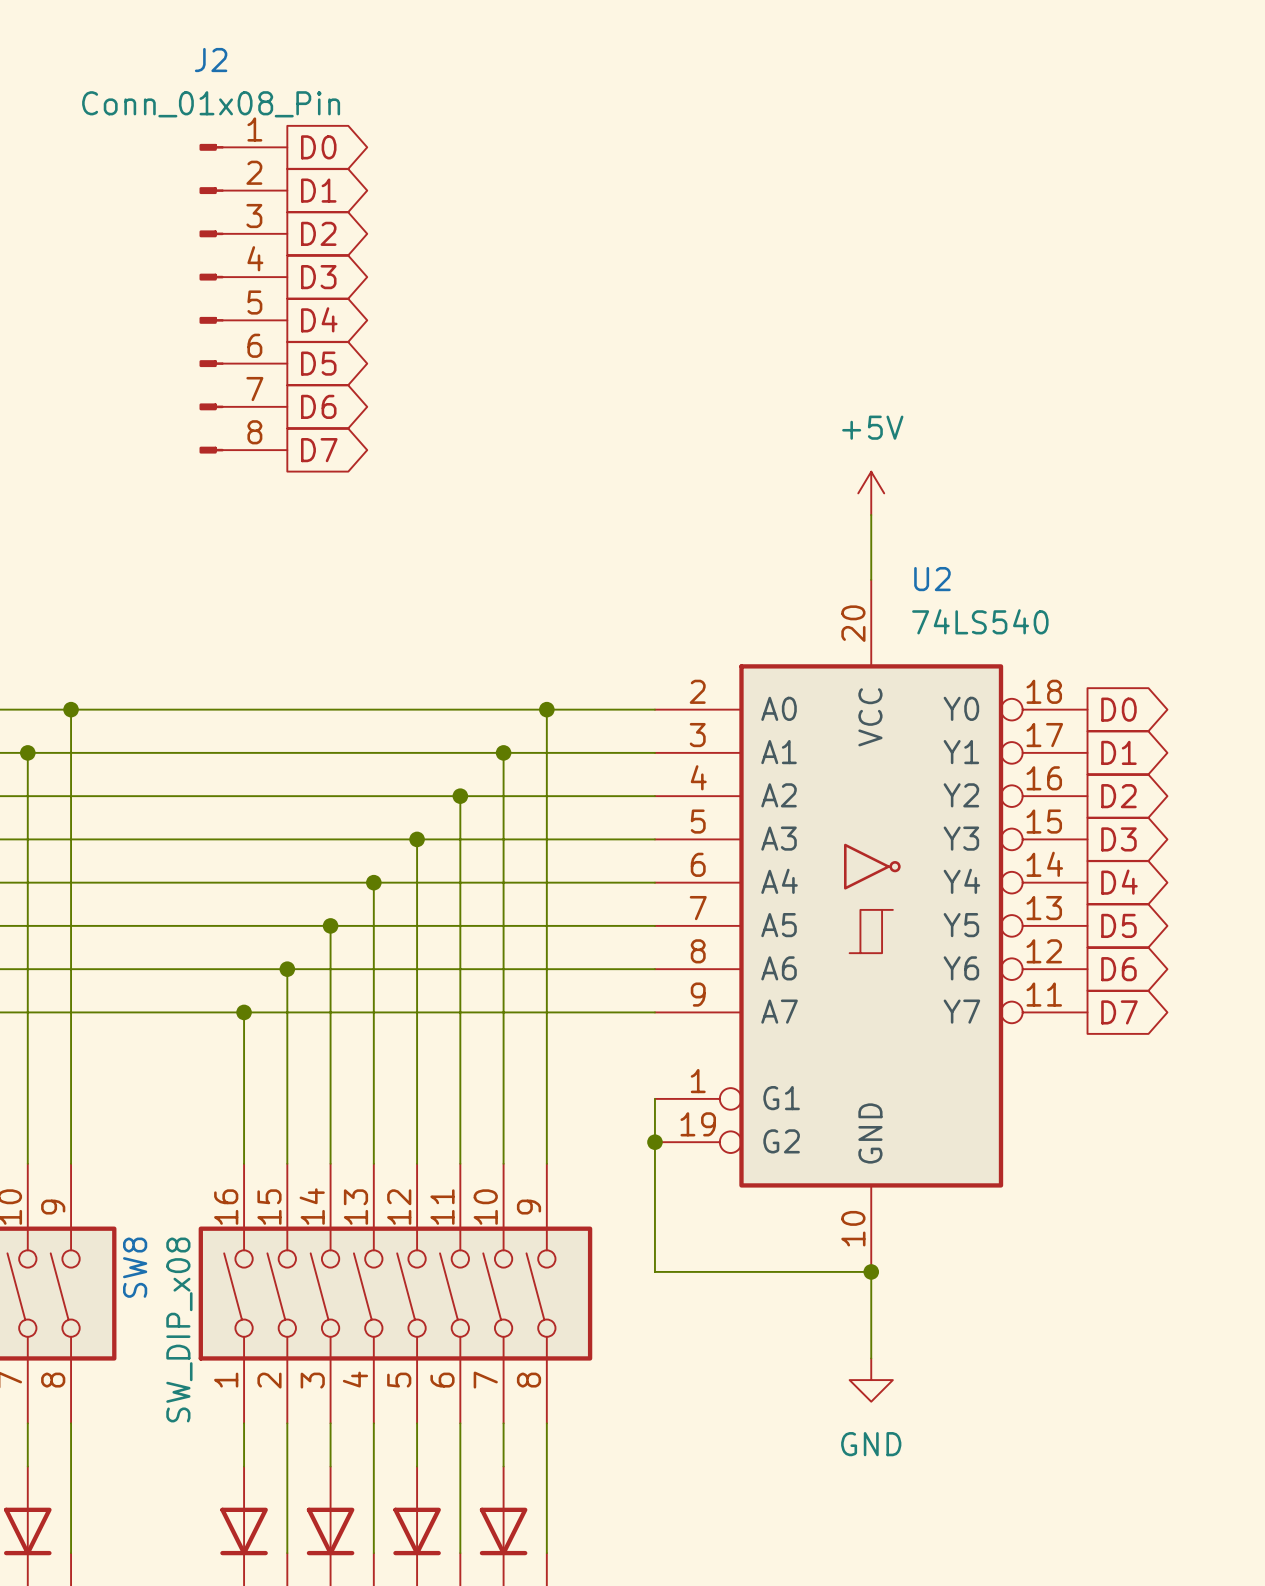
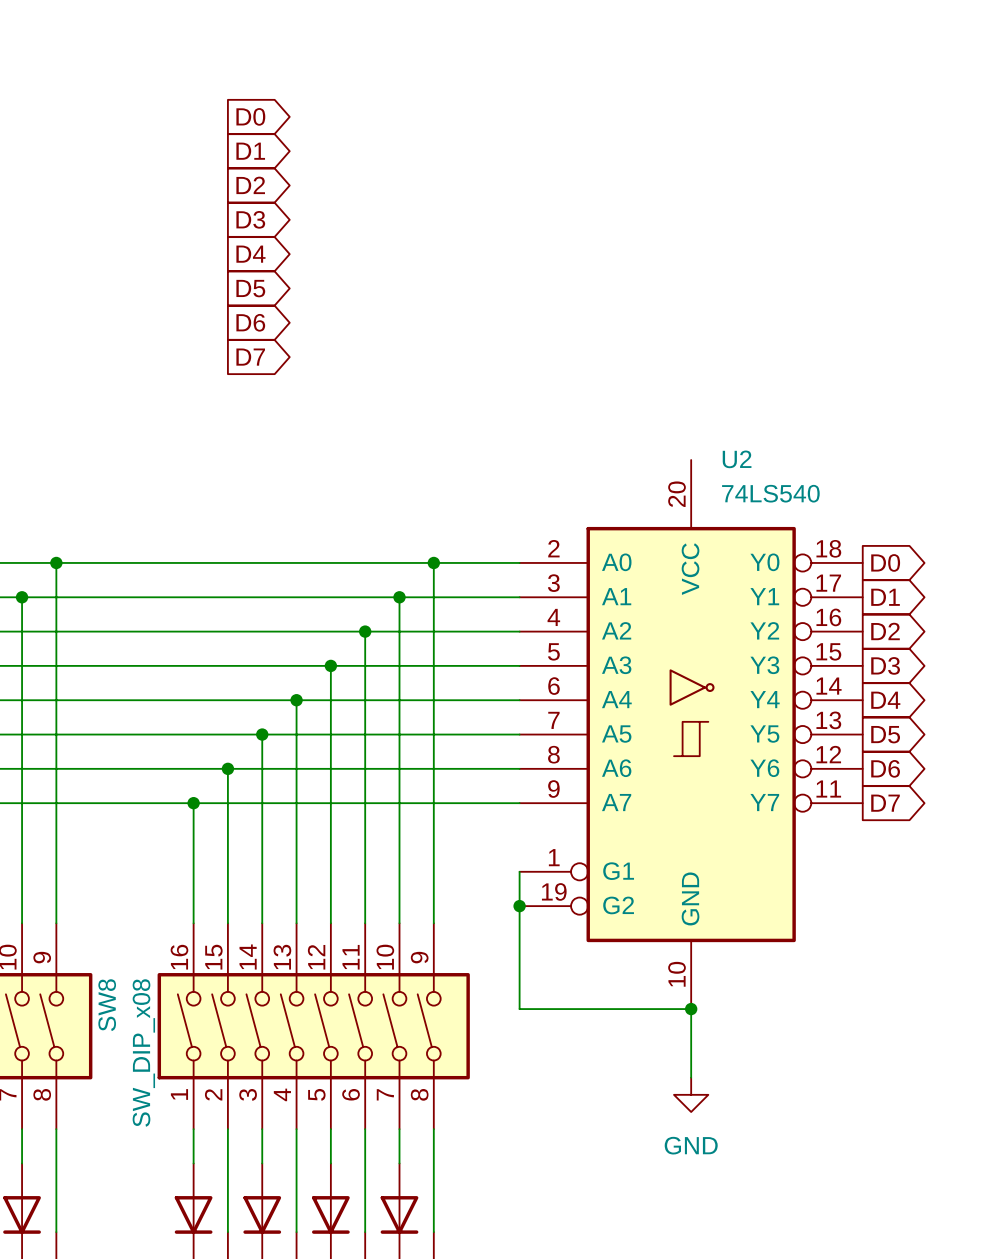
J2: Conn_01x08_Pin (243, 298) -> none
power symbol: +5V (871, 493) -> none
wire: (871, 515) (871, 579) -> none

